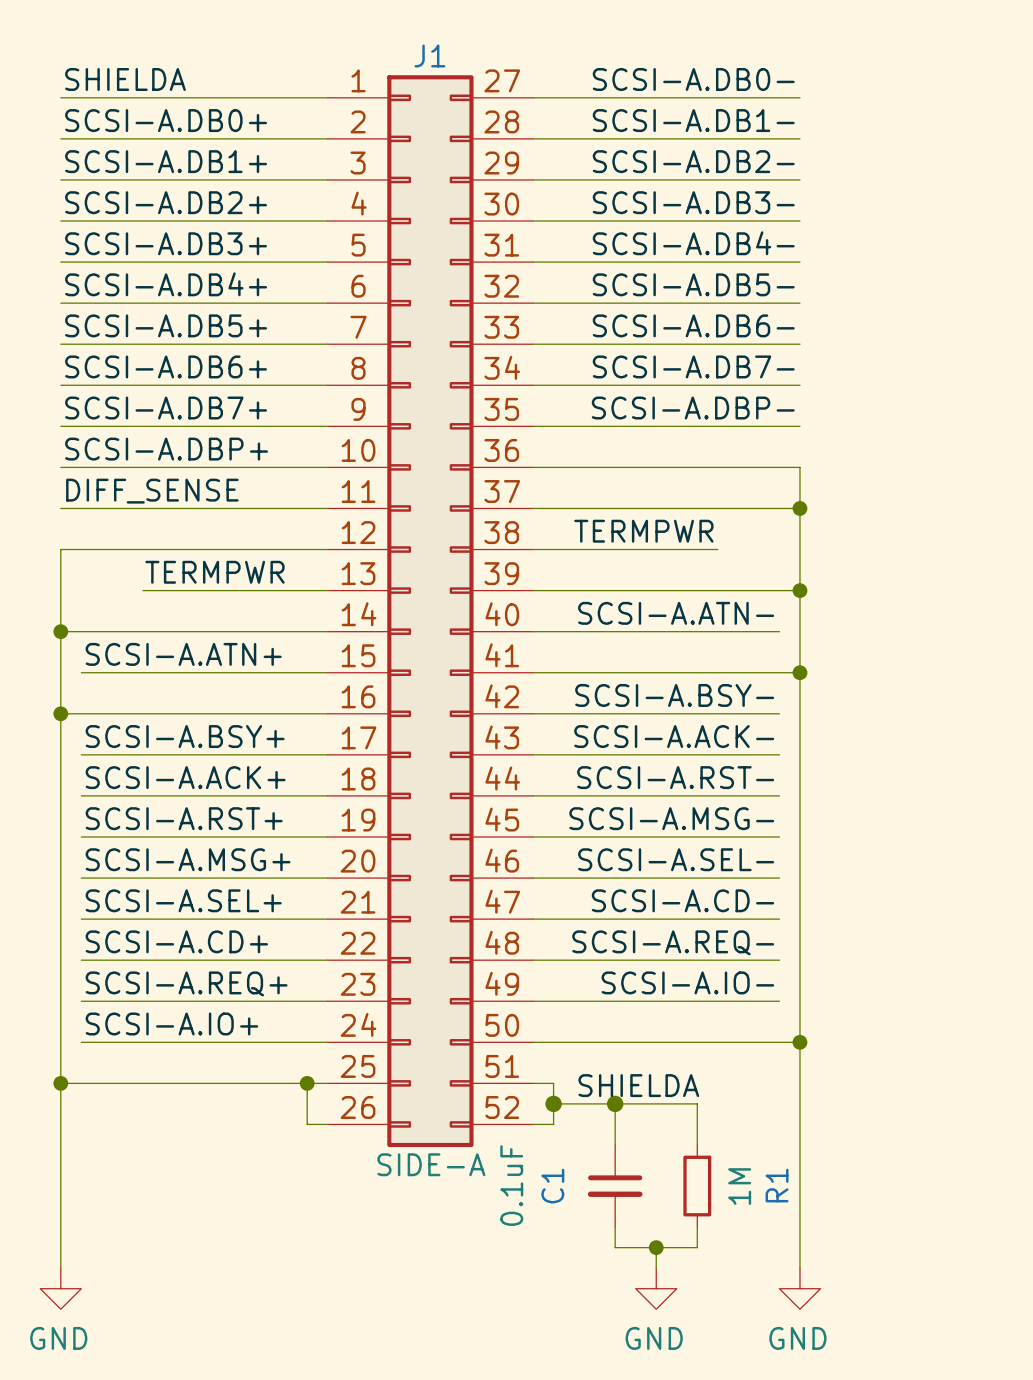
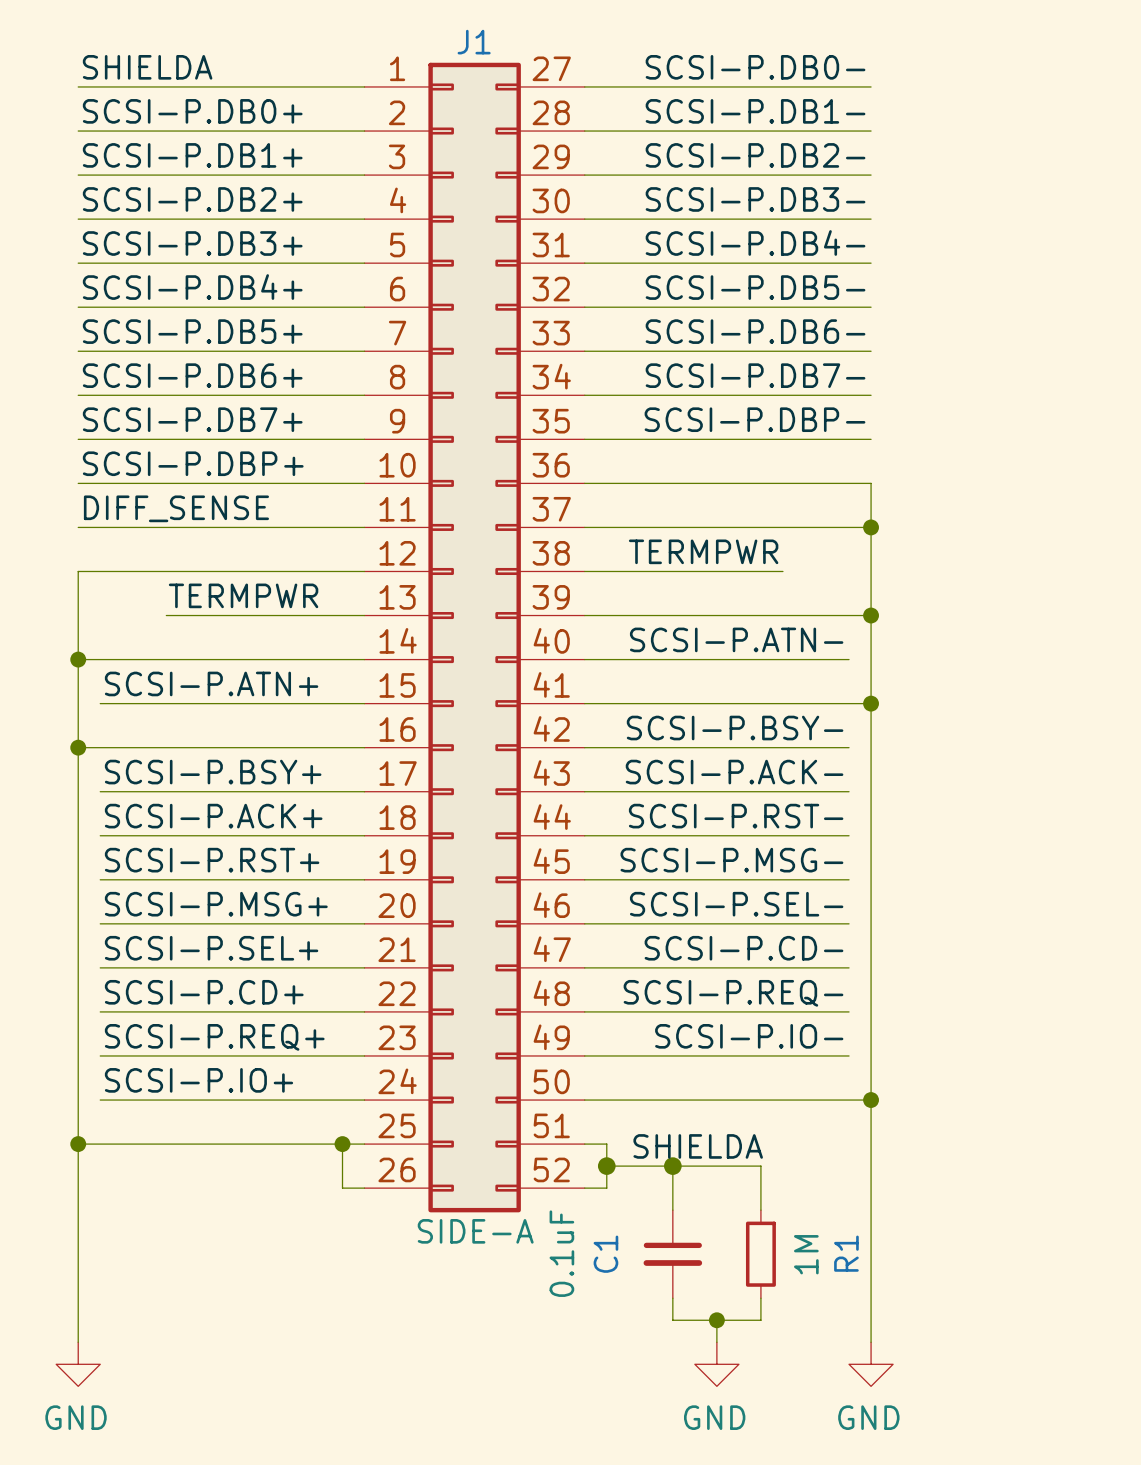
label: SCSI-A.DB0- (693, 79) -> SCSI-P.DB0- (755, 67)
label: SCSI-A.DB0+ (166, 120) -> SCSI-P.DB0+ (192, 111)
label: SCSI-A.DB1- (693, 120) -> SCSI-P.DB1- (755, 111)
label: SCSI-A.DB1+ (166, 161) -> SCSI-P.DB1+ (192, 155)
label: SCSI-A.DB2- (693, 161) -> SCSI-P.DB2- (755, 155)
label: SCSI-A.DB2+ (166, 202) -> SCSI-P.DB2+ (192, 199)
label: SCSI-A.DB3- (693, 202) -> SCSI-P.DB3- (755, 199)
label: SCSI-A.DB3+ (166, 243) -> SCSI-P.DB3+ (192, 243)
label: SCSI-A.DB4- (693, 243) -> SCSI-P.DB4- (755, 242)
label: SCSI-A.DB4+ (166, 284) -> SCSI-P.DB4+ (192, 287)
label: SCSI-A.DB5- (693, 284) -> SCSI-P.DB5- (755, 287)
label: SCSI-A.DB5+ (166, 325) -> SCSI-P.DB5+ (192, 331)
label: SCSI-A.DB6- (693, 325) -> SCSI-P.DB6- (755, 331)
label: SCSI-A.DB6+ (166, 366) -> SCSI-P.DB6+ (192, 375)
label: SCSI-A.DB7- (693, 366) -> SCSI-P.DB7- (755, 375)
label: SCSI-A.DB7+ (166, 408) -> SCSI-P.DB7+ (192, 419)
label: SCSI-A.DBP- (693, 408) -> SCSI-P.DBP- (755, 419)
label: SCSI-A.DBP+ (166, 449) -> SCSI-P.DBP+ (193, 463)
label: SCSI-A.ATN- (676, 613) -> SCSI-P.ATN- (736, 639)
label: SCSI-A.ATN+ (183, 654) -> SCSI-P.ATN+ (211, 683)
label: SCSI-A.BSY- (674, 695) -> SCSI-P.BSY- (735, 728)
label: SCSI-A.BSY+ (185, 736) -> SCSI-P.BSY+ (213, 772)
label: SCSI-A.ACK- (674, 736) -> SCSI-P.ACK- (734, 772)
label: SCSI-A.ACK+ (185, 777) -> SCSI-P.ACK+ (213, 816)
label: SCSI-A.RST- (675, 777) -> SCSI-P.RST- (736, 816)
label: SCSI-A.RST+ (184, 818) -> SCSI-P.RST+ (212, 860)
label: SCSI-A.MSG- (671, 818) -> SCSI-P.MSG- (731, 860)
label: SCSI-A.MSG+ (188, 859) -> SCSI-P.MSG+ (216, 904)
label: SCSI-A.SEL- (676, 859) -> SCSI-P.SEL- (736, 904)
label: SCSI-A.SEL+ (183, 900) -> SCSI-P.SEL+ (211, 948)
label: SCSI-A.CD- (682, 900) -> SCSI-P.CD- (743, 948)
label: SCSI-A.CD+ (176, 941) -> SCSI-P.CD+ (204, 992)
label: SCSI-A.REQ- (673, 942) -> SCSI-P.REQ- (733, 993)
label: SCSI-A.IO- (687, 982) -> SCSI-P.IO- (749, 1036)
label: SCSI-A.REQ+ (186, 983) -> SCSI-P.REQ+ (214, 1037)
label: SCSI-A.IO+ (171, 1023) -> SCSI-P.IO+ (198, 1080)

